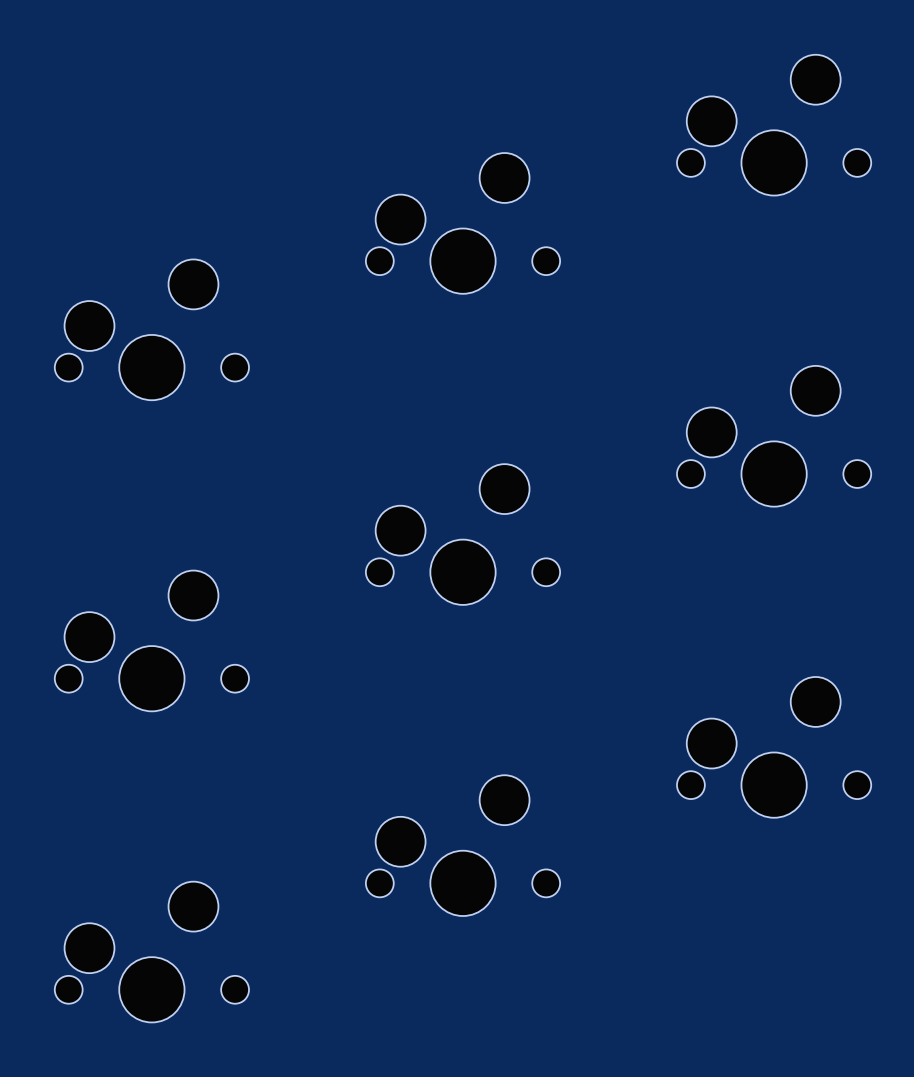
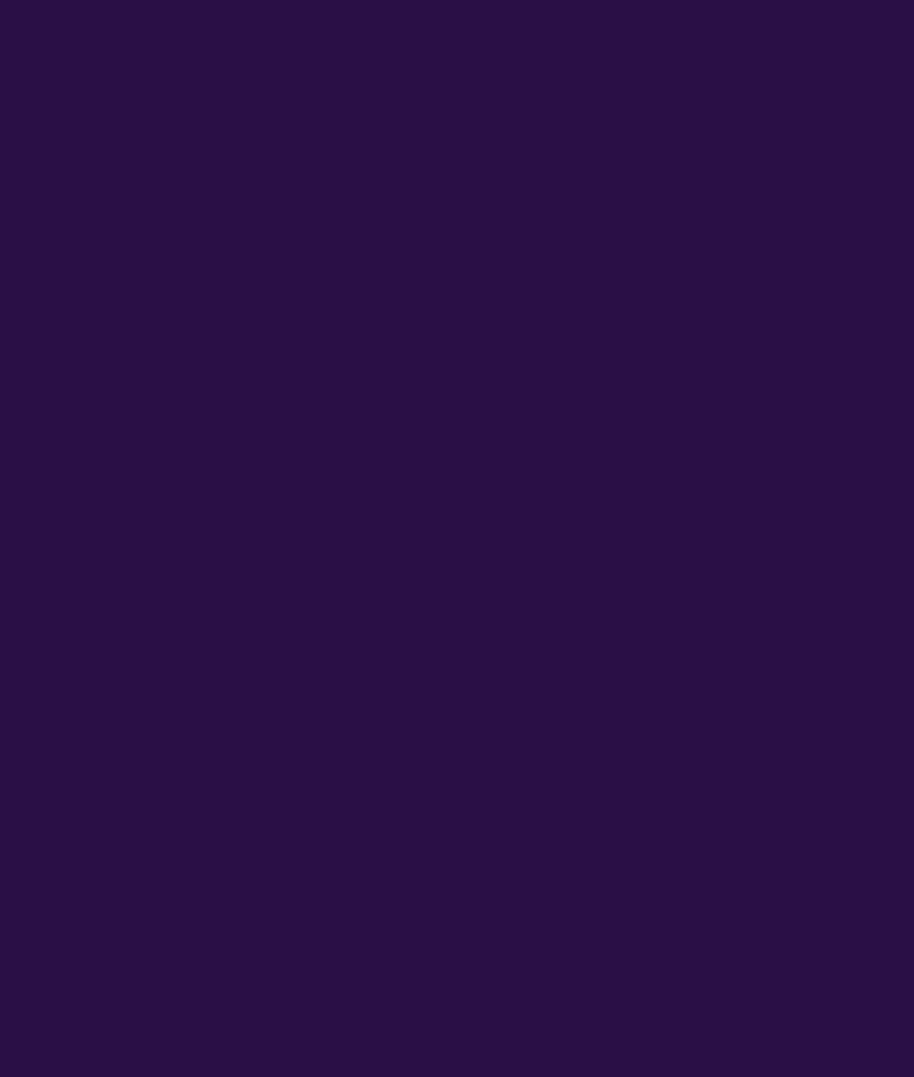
part: (774, 125) -> none
part: (463, 223) -> none
part: (151, 329) -> none
part: (774, 436) -> none
part: (463, 534) -> none
part: (151, 640) -> none
part: (774, 747) -> none
part: (463, 845) -> none
part: (151, 952) -> none

